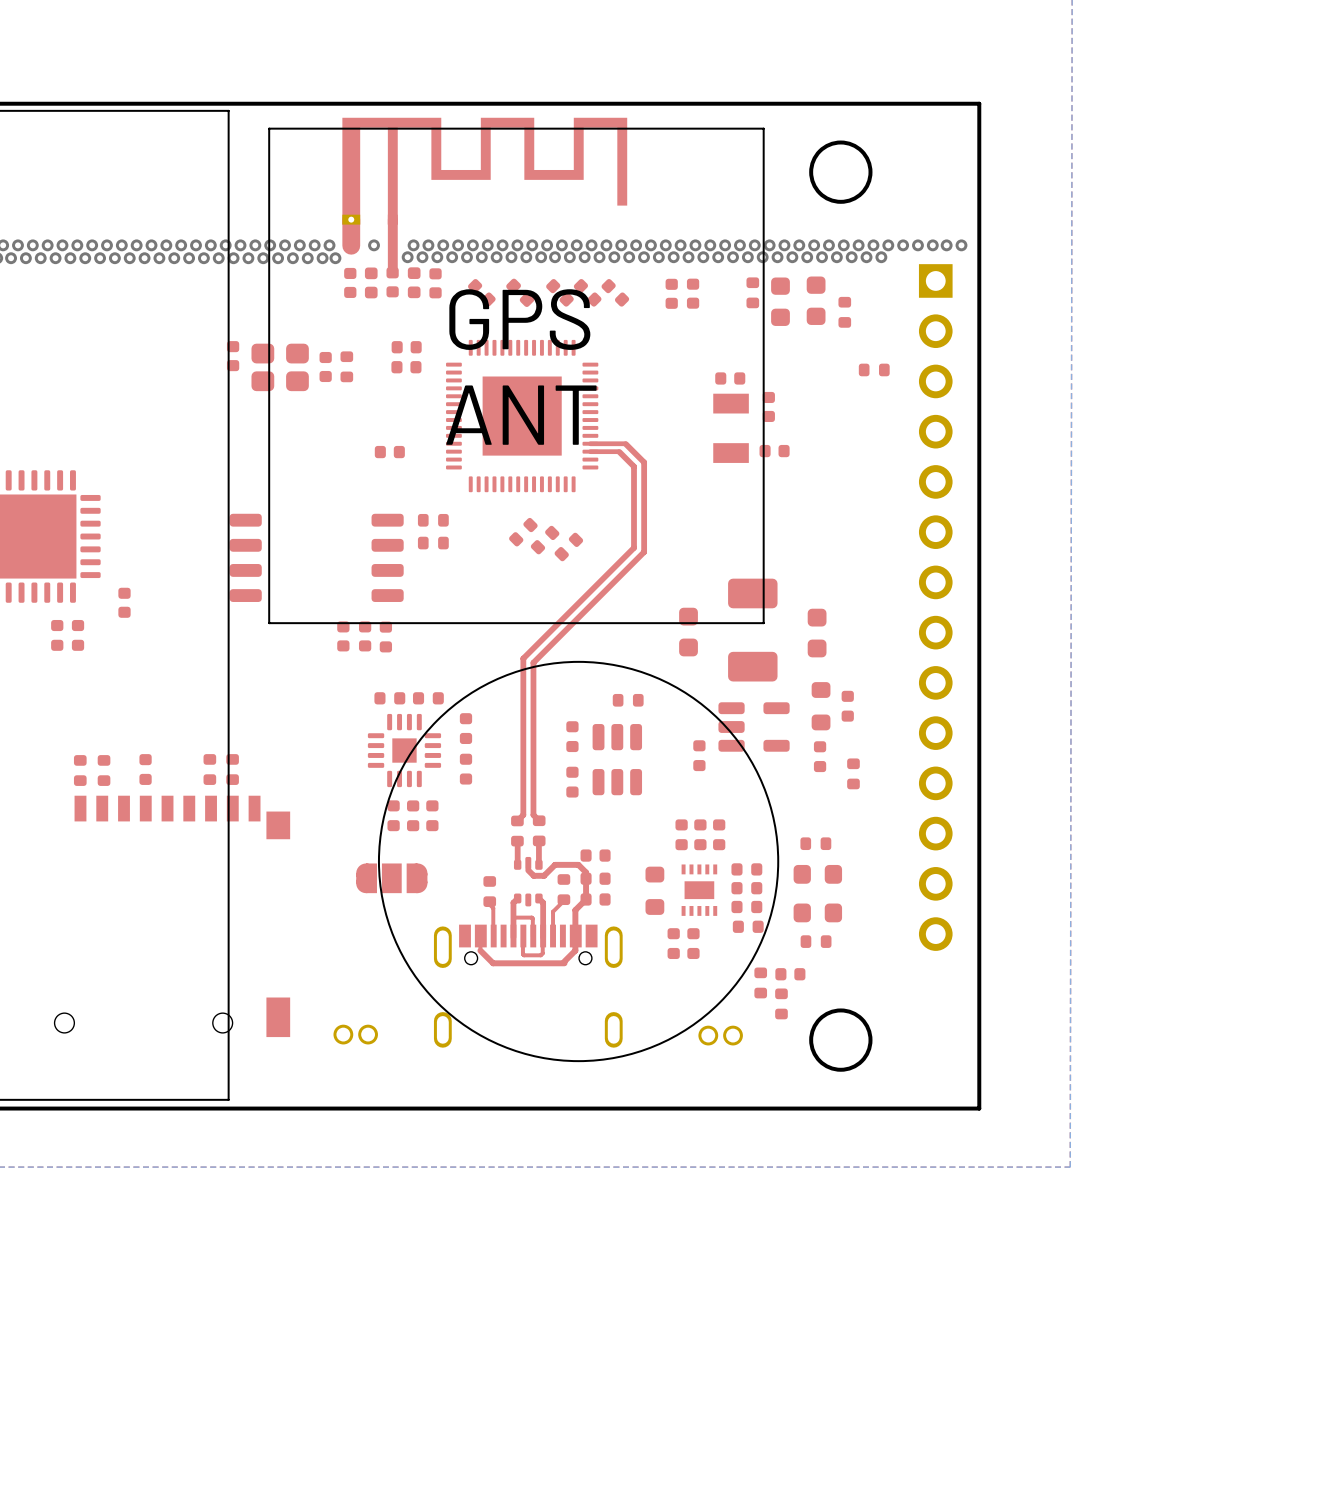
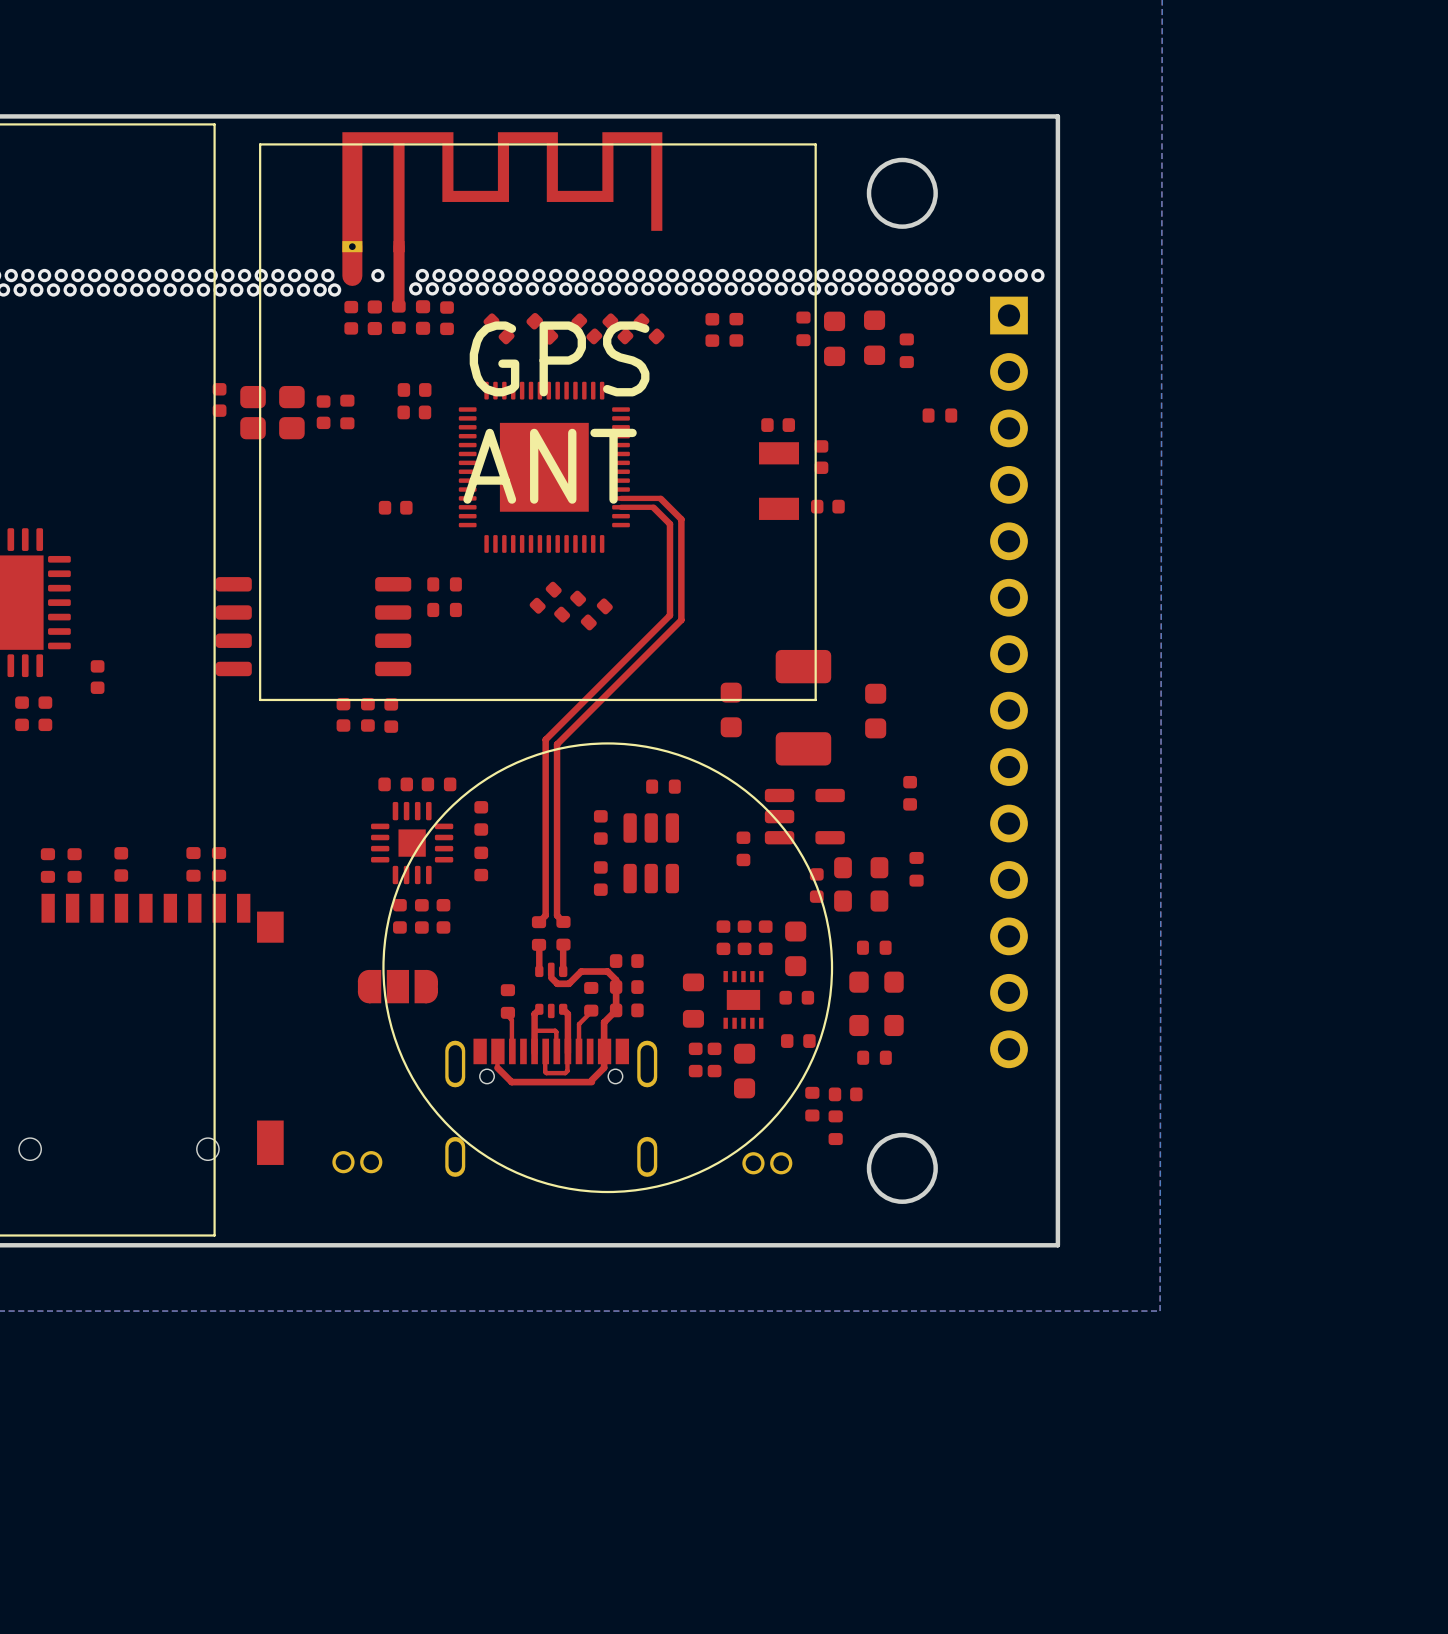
part: (821, 706) -> none
part: (820, 756) -> none
part: none -> (861, 867)
part: none -> (816, 885)
part: none -> (861, 901)
part: none -> (795, 948)
part: (746, 869) -> none
part: (746, 906) -> none
part footprint: [687, 928, 700, 960] -> [734, 1043, 756, 1099]
part: none -> (695, 1059)

